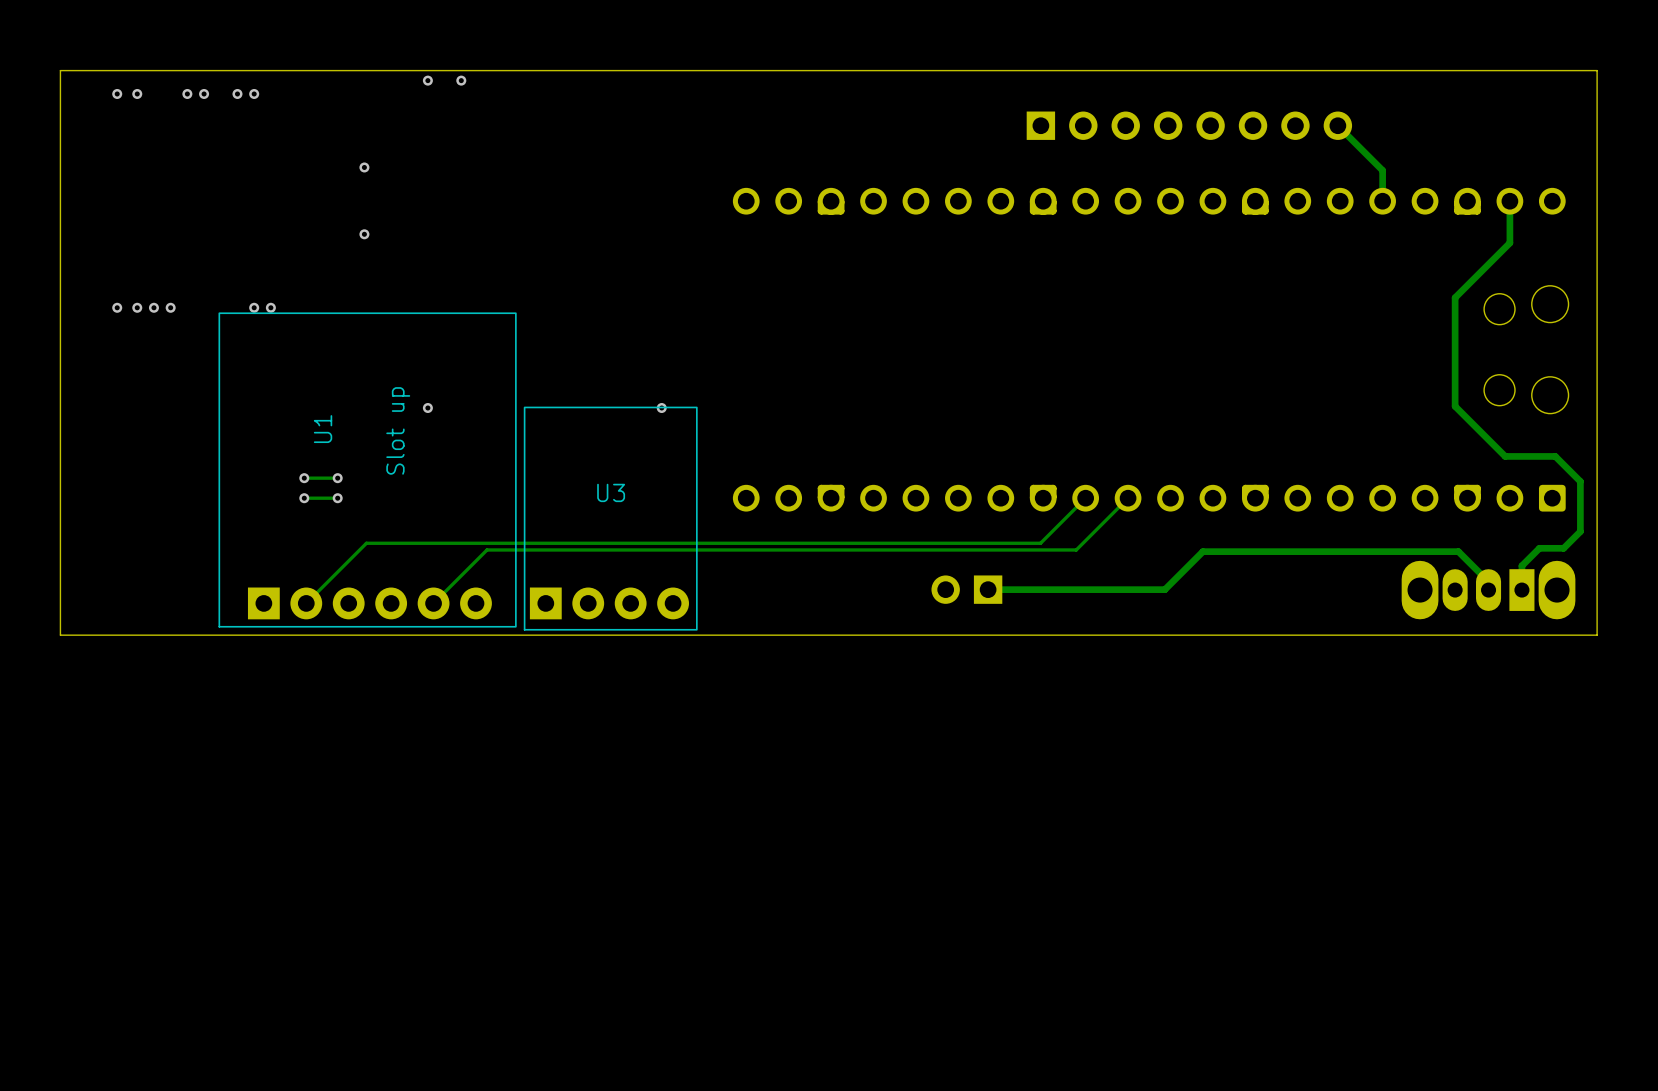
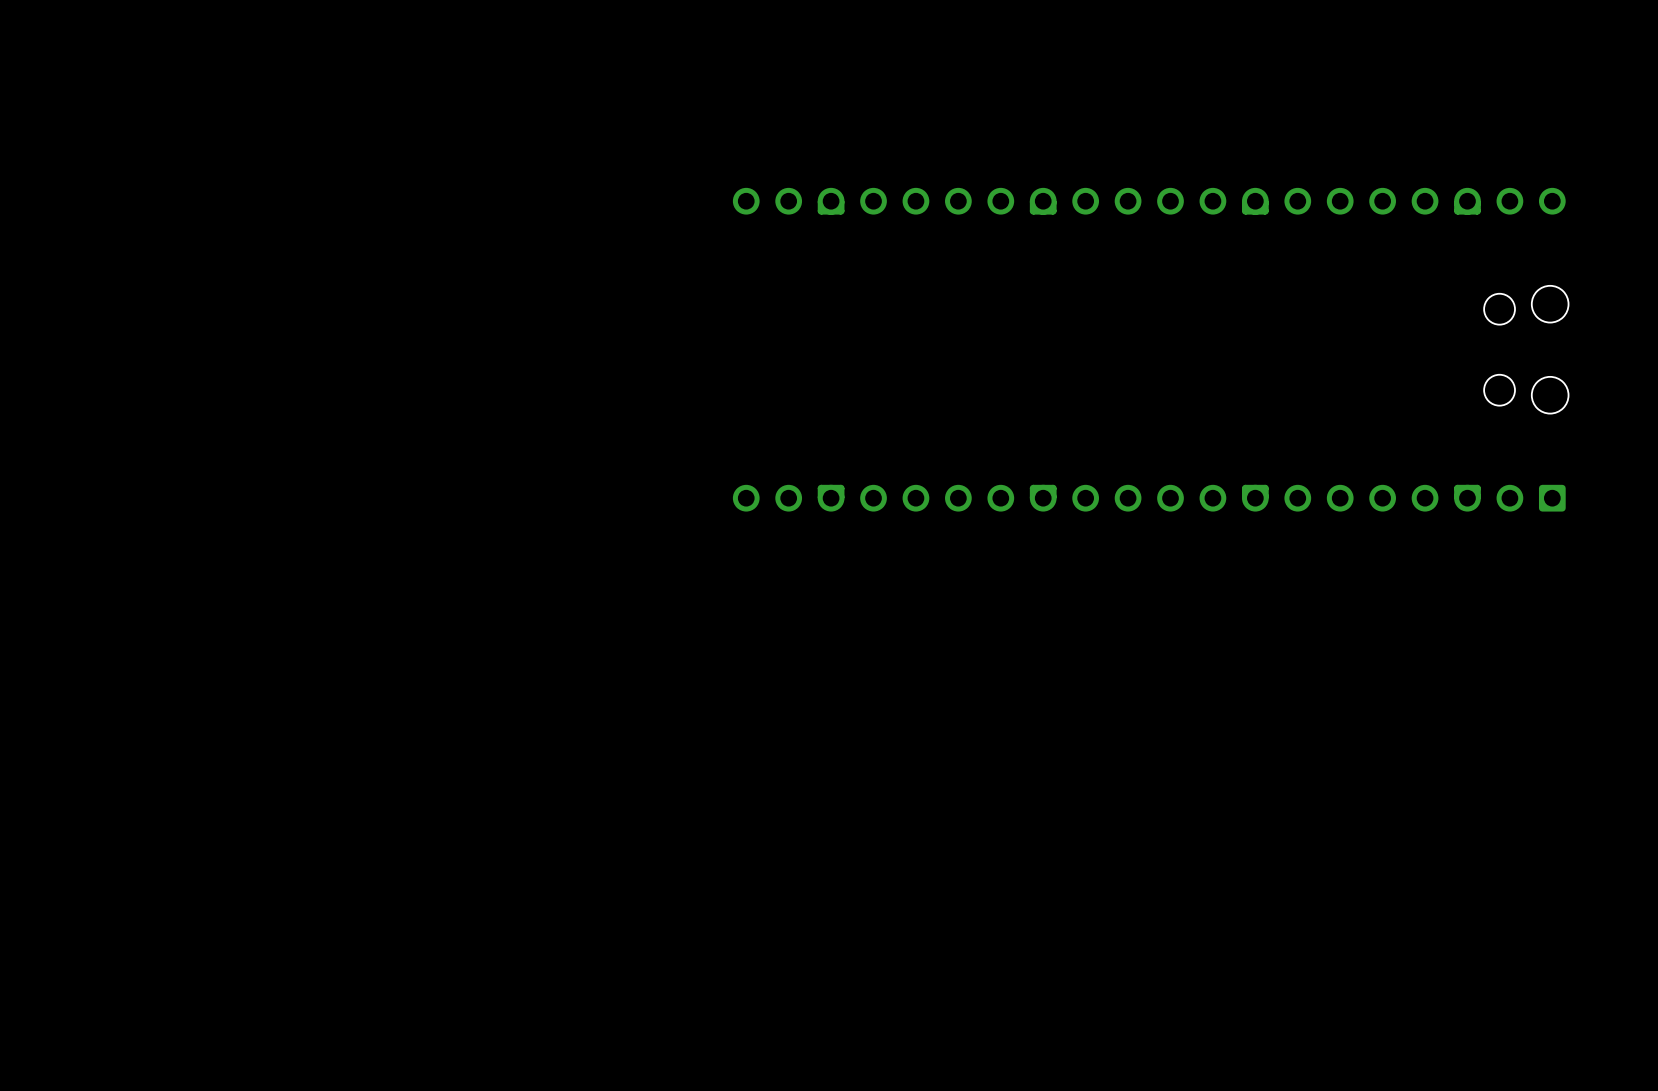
board edge: (1597, 70) (60, 70) (60, 635) (1597, 635) (1597, 70) -> none
via: (427, 80) -> none
via: (461, 80) -> none
via: (117, 93) -> none
via: (137, 93) -> none
via: (187, 93) -> none
via: (204, 93) -> none
via: (237, 93) -> none
via: (254, 93) -> none
part: (1189, 125) -> none
track: (1337, 125) (1382, 170) (1382, 201) -> none
via: (364, 167) -> none
track: (1509, 201) (1509, 242) (1455, 297) (1455, 406) (1505, 456) (1555, 456) (1580, 481) (1580, 531) (1563, 548) (1539, 548) (1521, 565) (1521, 590) -> none
via: (364, 234) -> none
via: (117, 307) -> none
via: (137, 307) -> none
via: (153, 307) -> none
via: (170, 307) -> none
via: (254, 307) -> none
via: (270, 307) -> none
via: (427, 408) -> none
via: (661, 408) -> none
U1: (367, 470) -> none
via: (304, 478) -> none
track: (337, 478) (304, 478) -> none
via: (337, 478) -> none
via: (304, 498) -> none
track: (337, 498) (304, 498) -> none
via: (337, 498) -> none
track: (1085, 498) (1040, 543) (366, 543) (306, 603) -> none
track: (1128, 498) (1076, 549) (487, 549) (433, 603) -> none
U3: (610, 518) -> none
part: (966, 589) -> none
track: (988, 589) (1164, 589) (1202, 551) (1458, 551) (1488, 581) (1488, 590) -> none
part: (1488, 590) -> none

